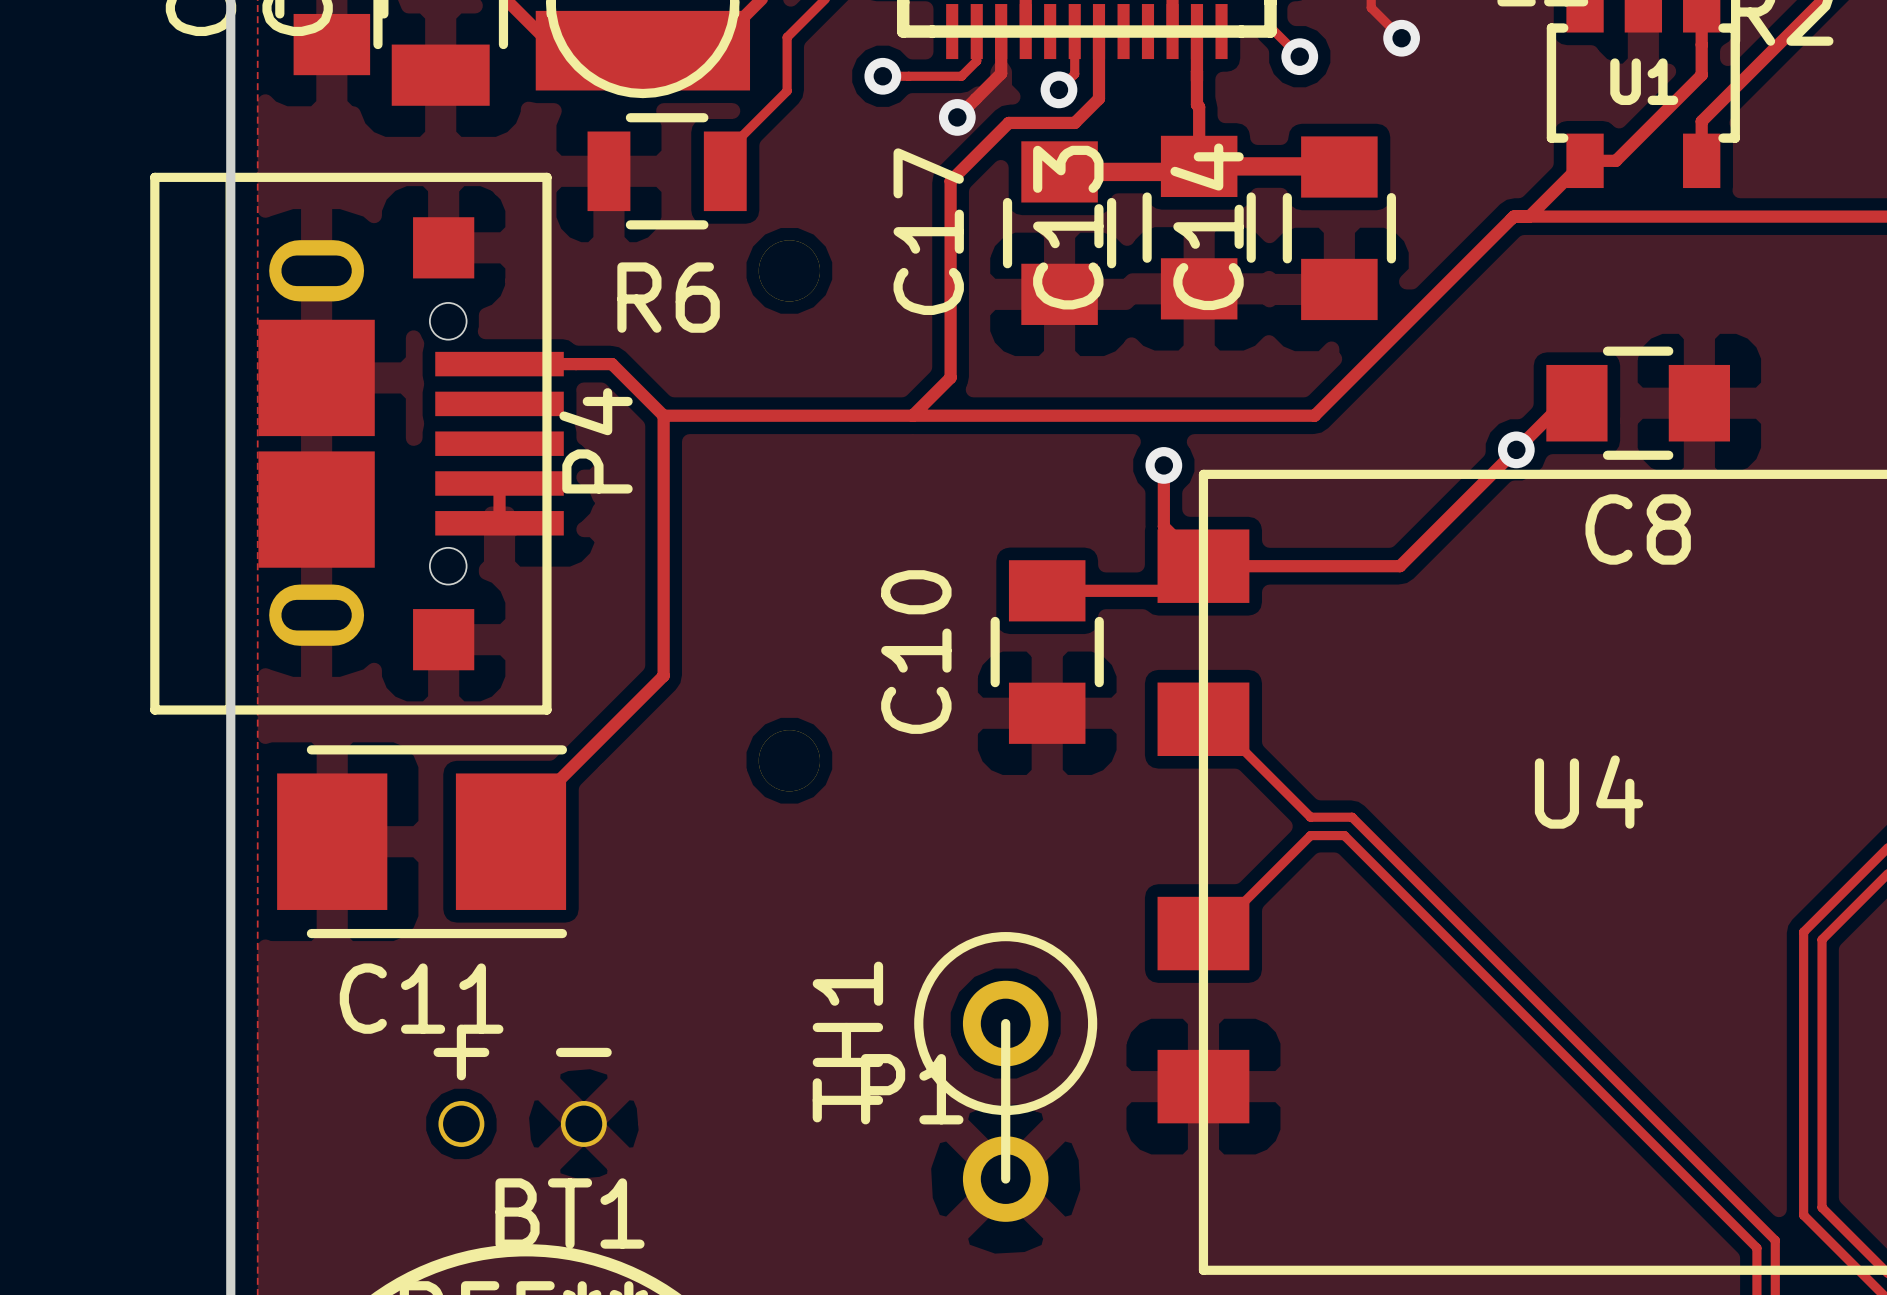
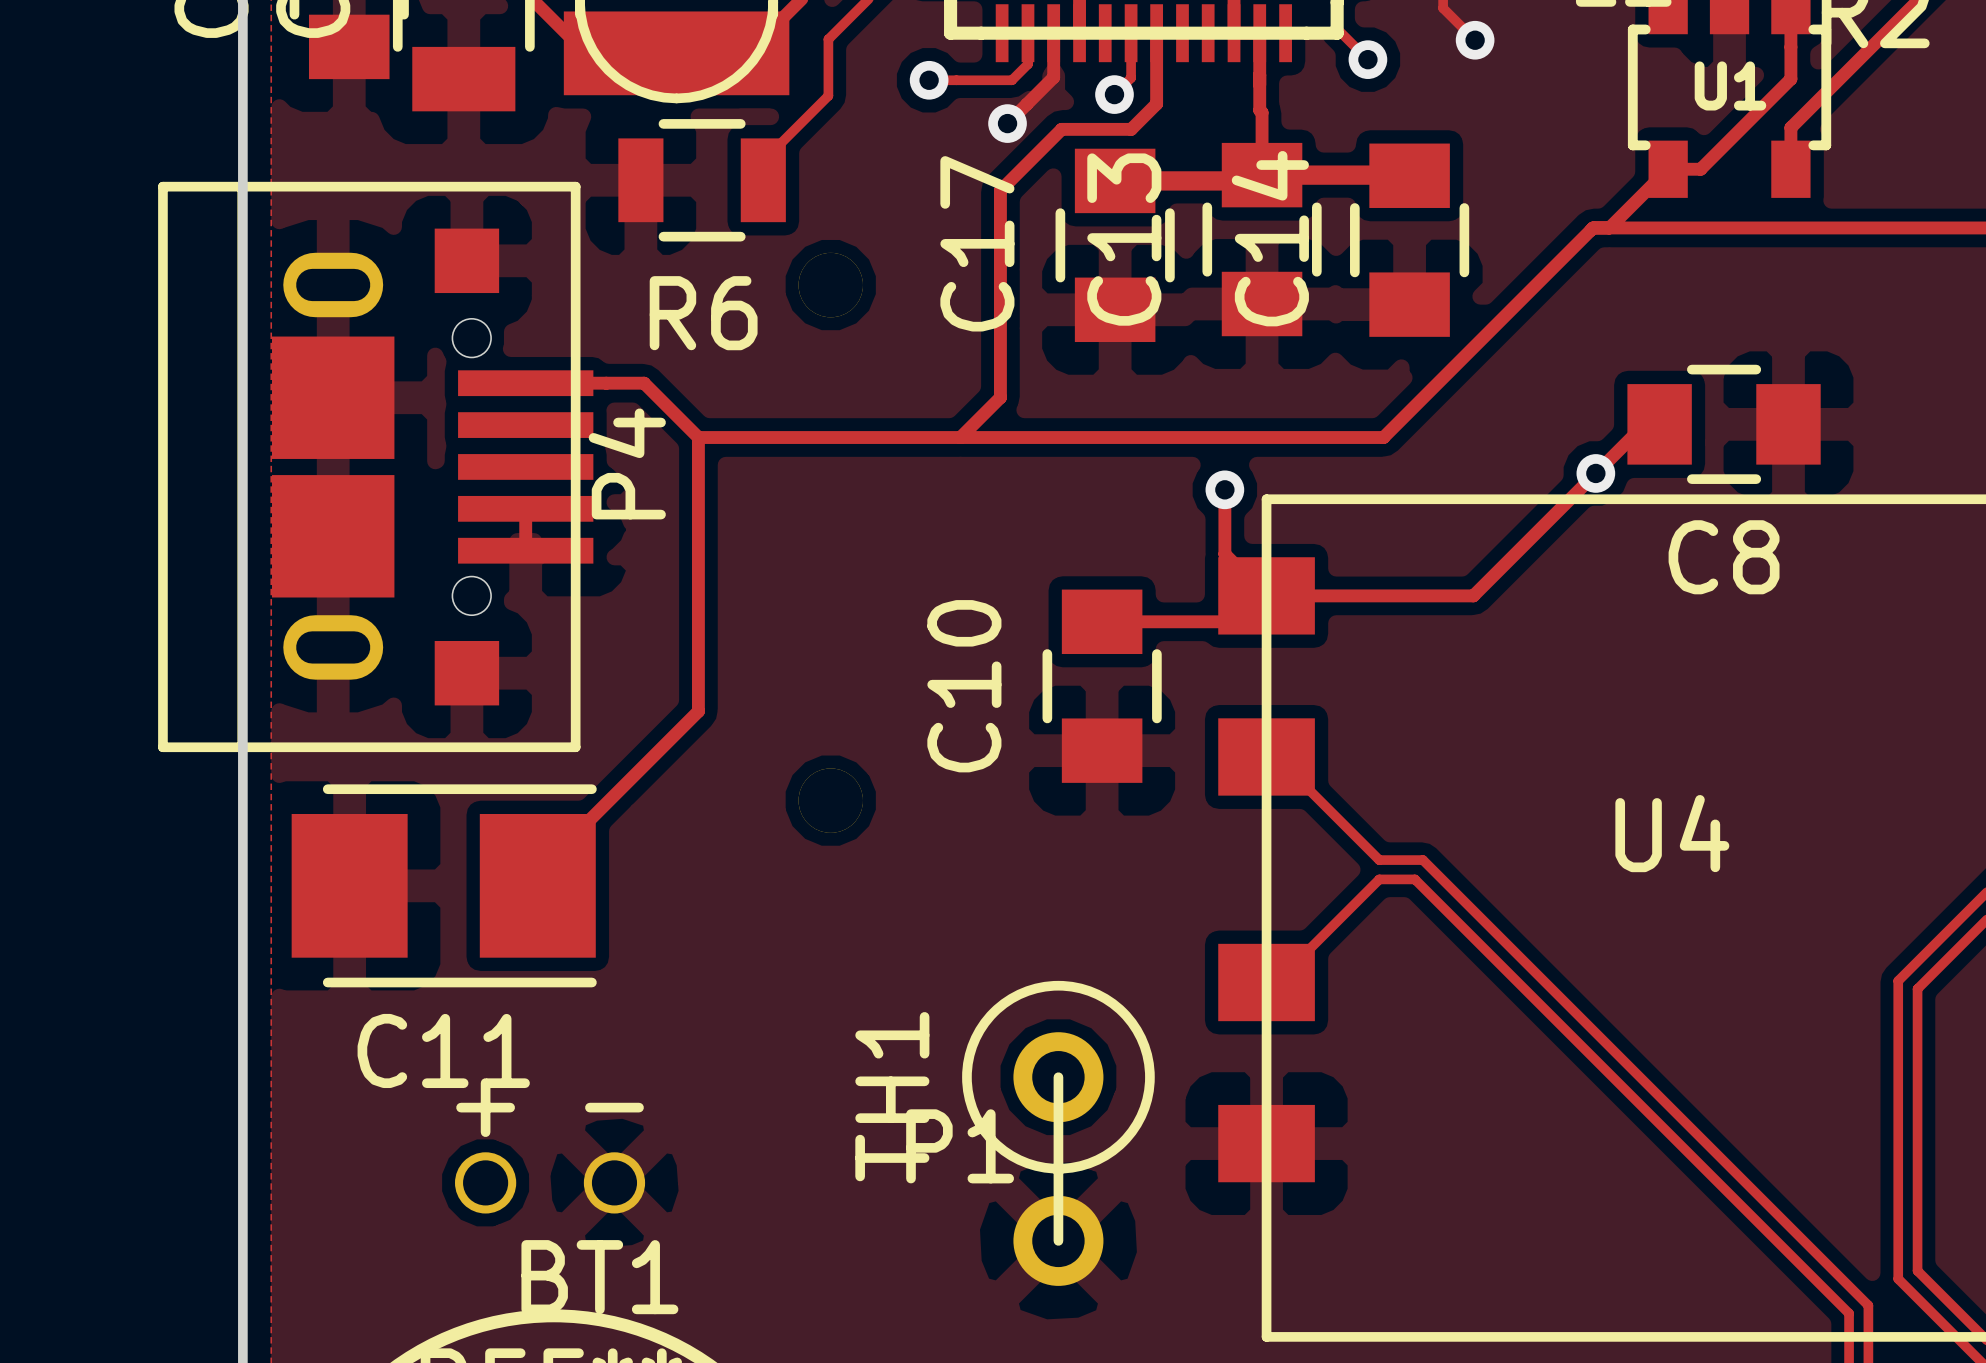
BT1 footprint: [438, 1101, 607, 1147] -> [454, 1152, 646, 1214]

